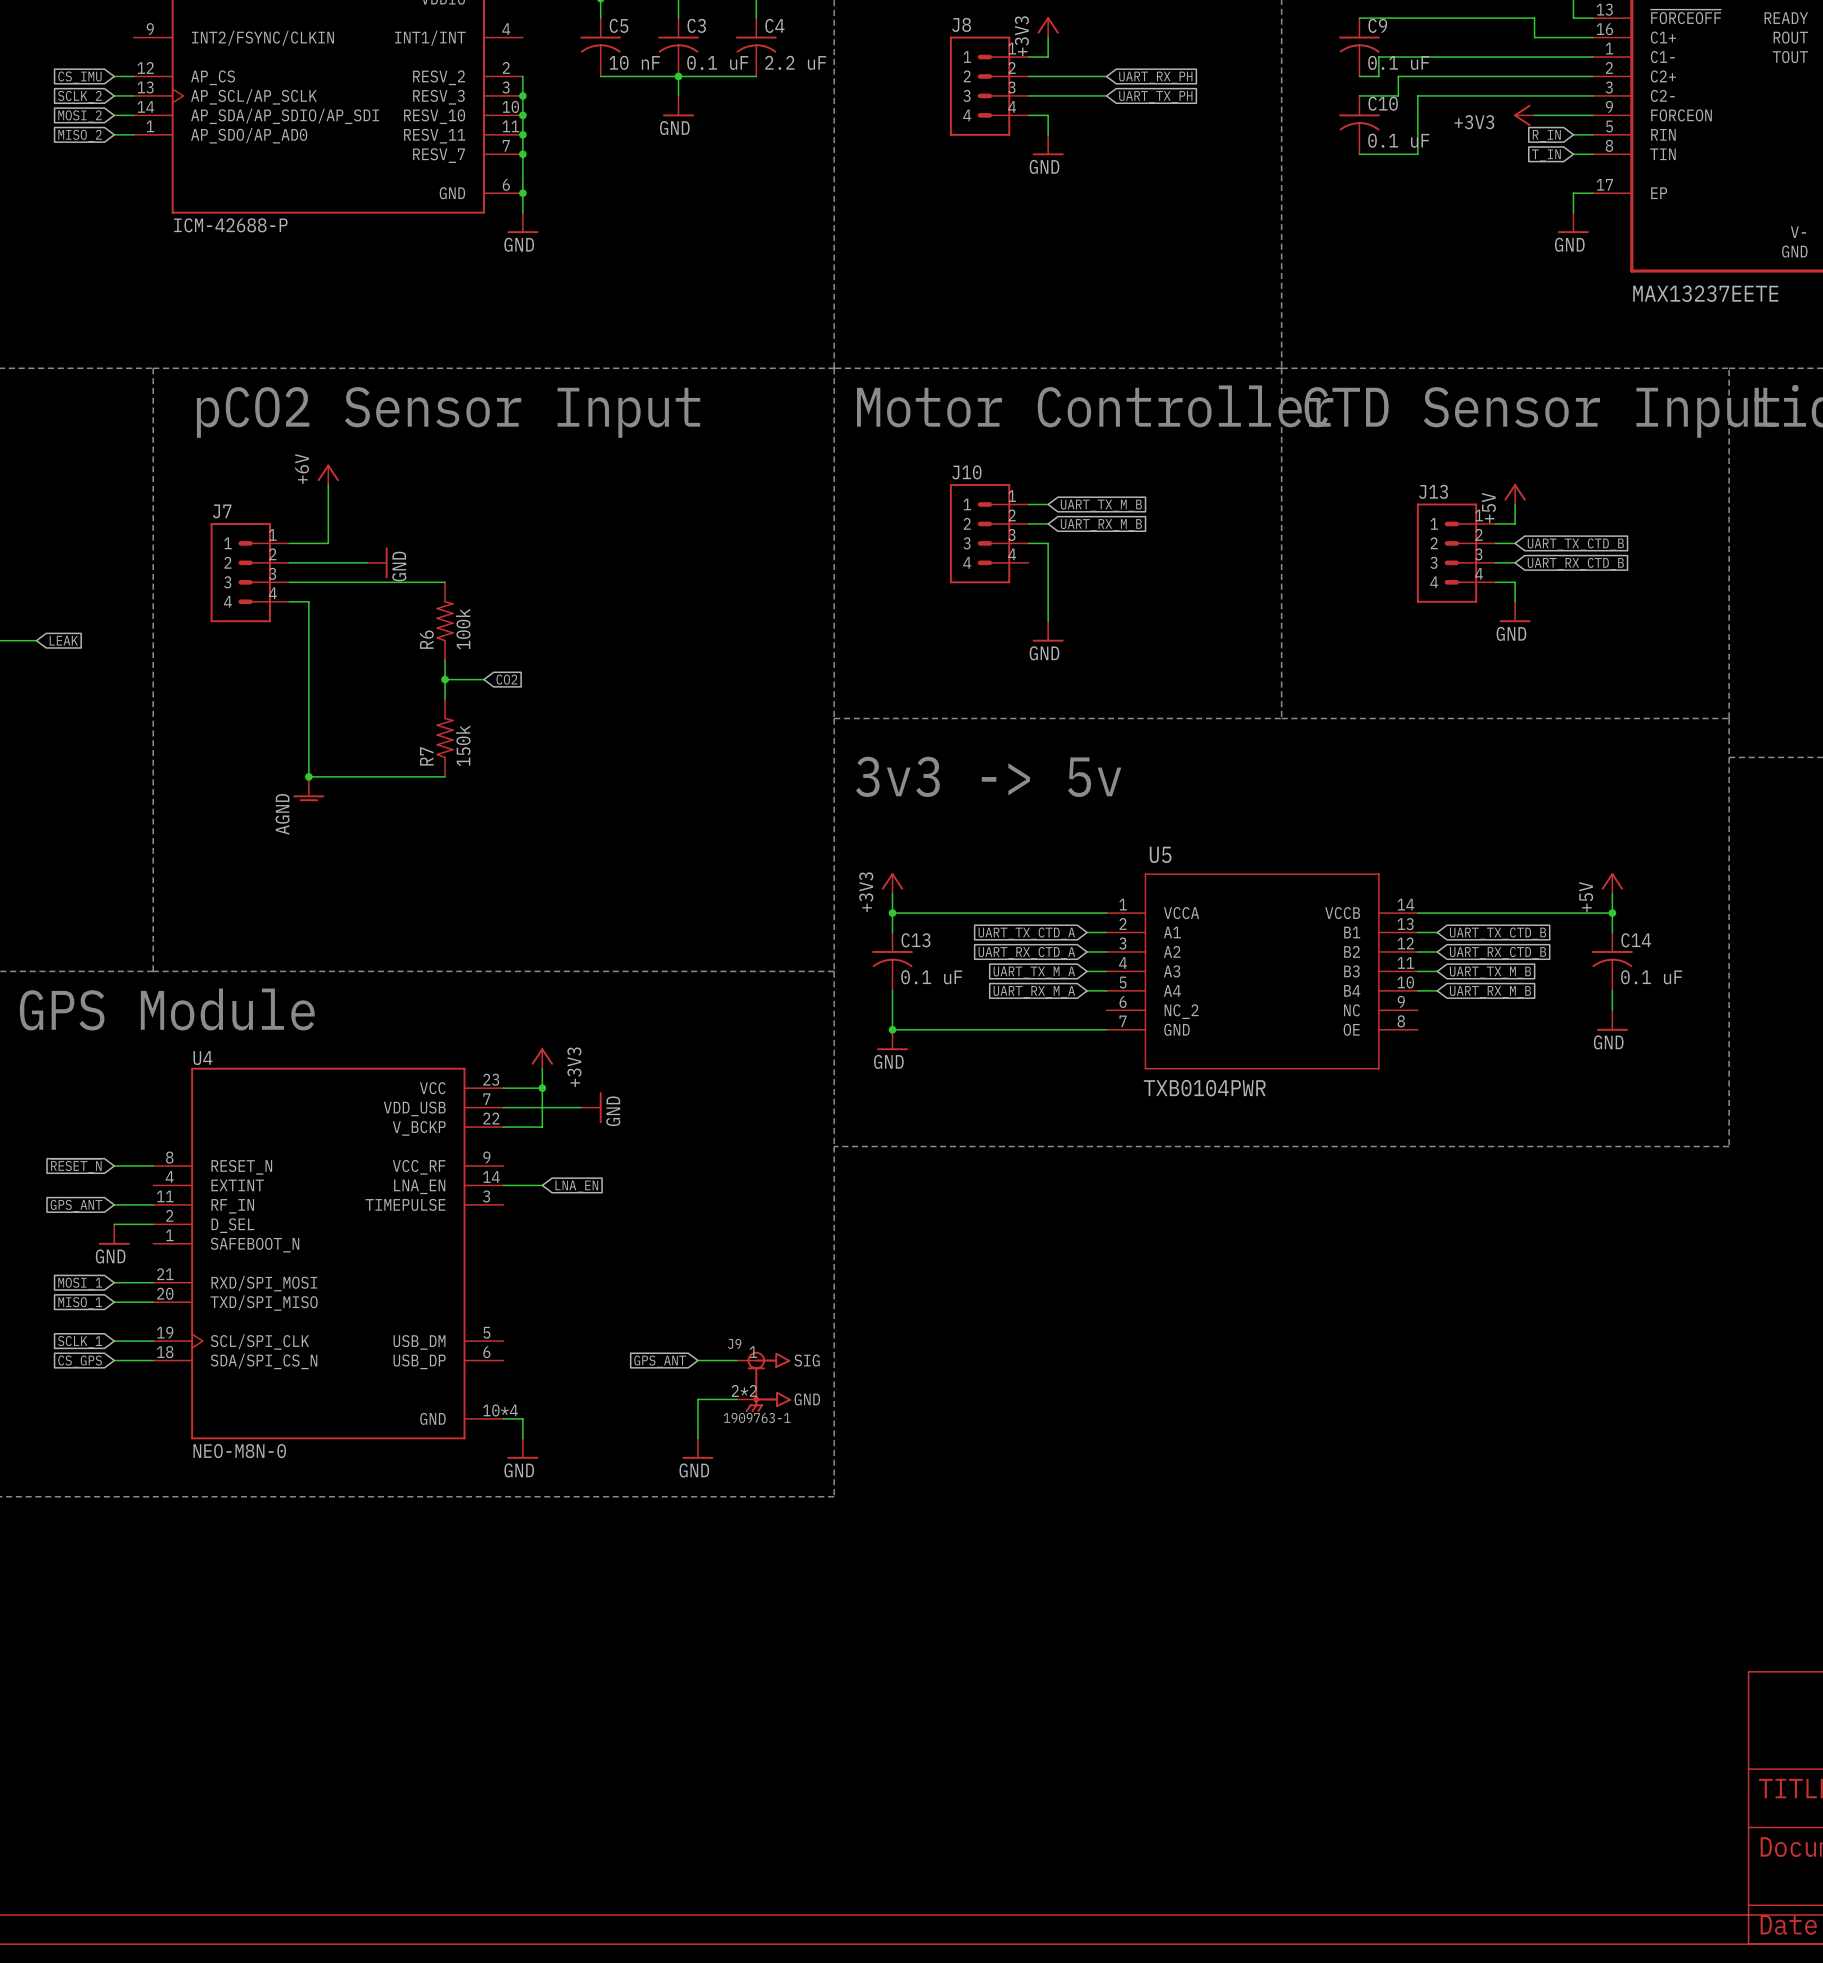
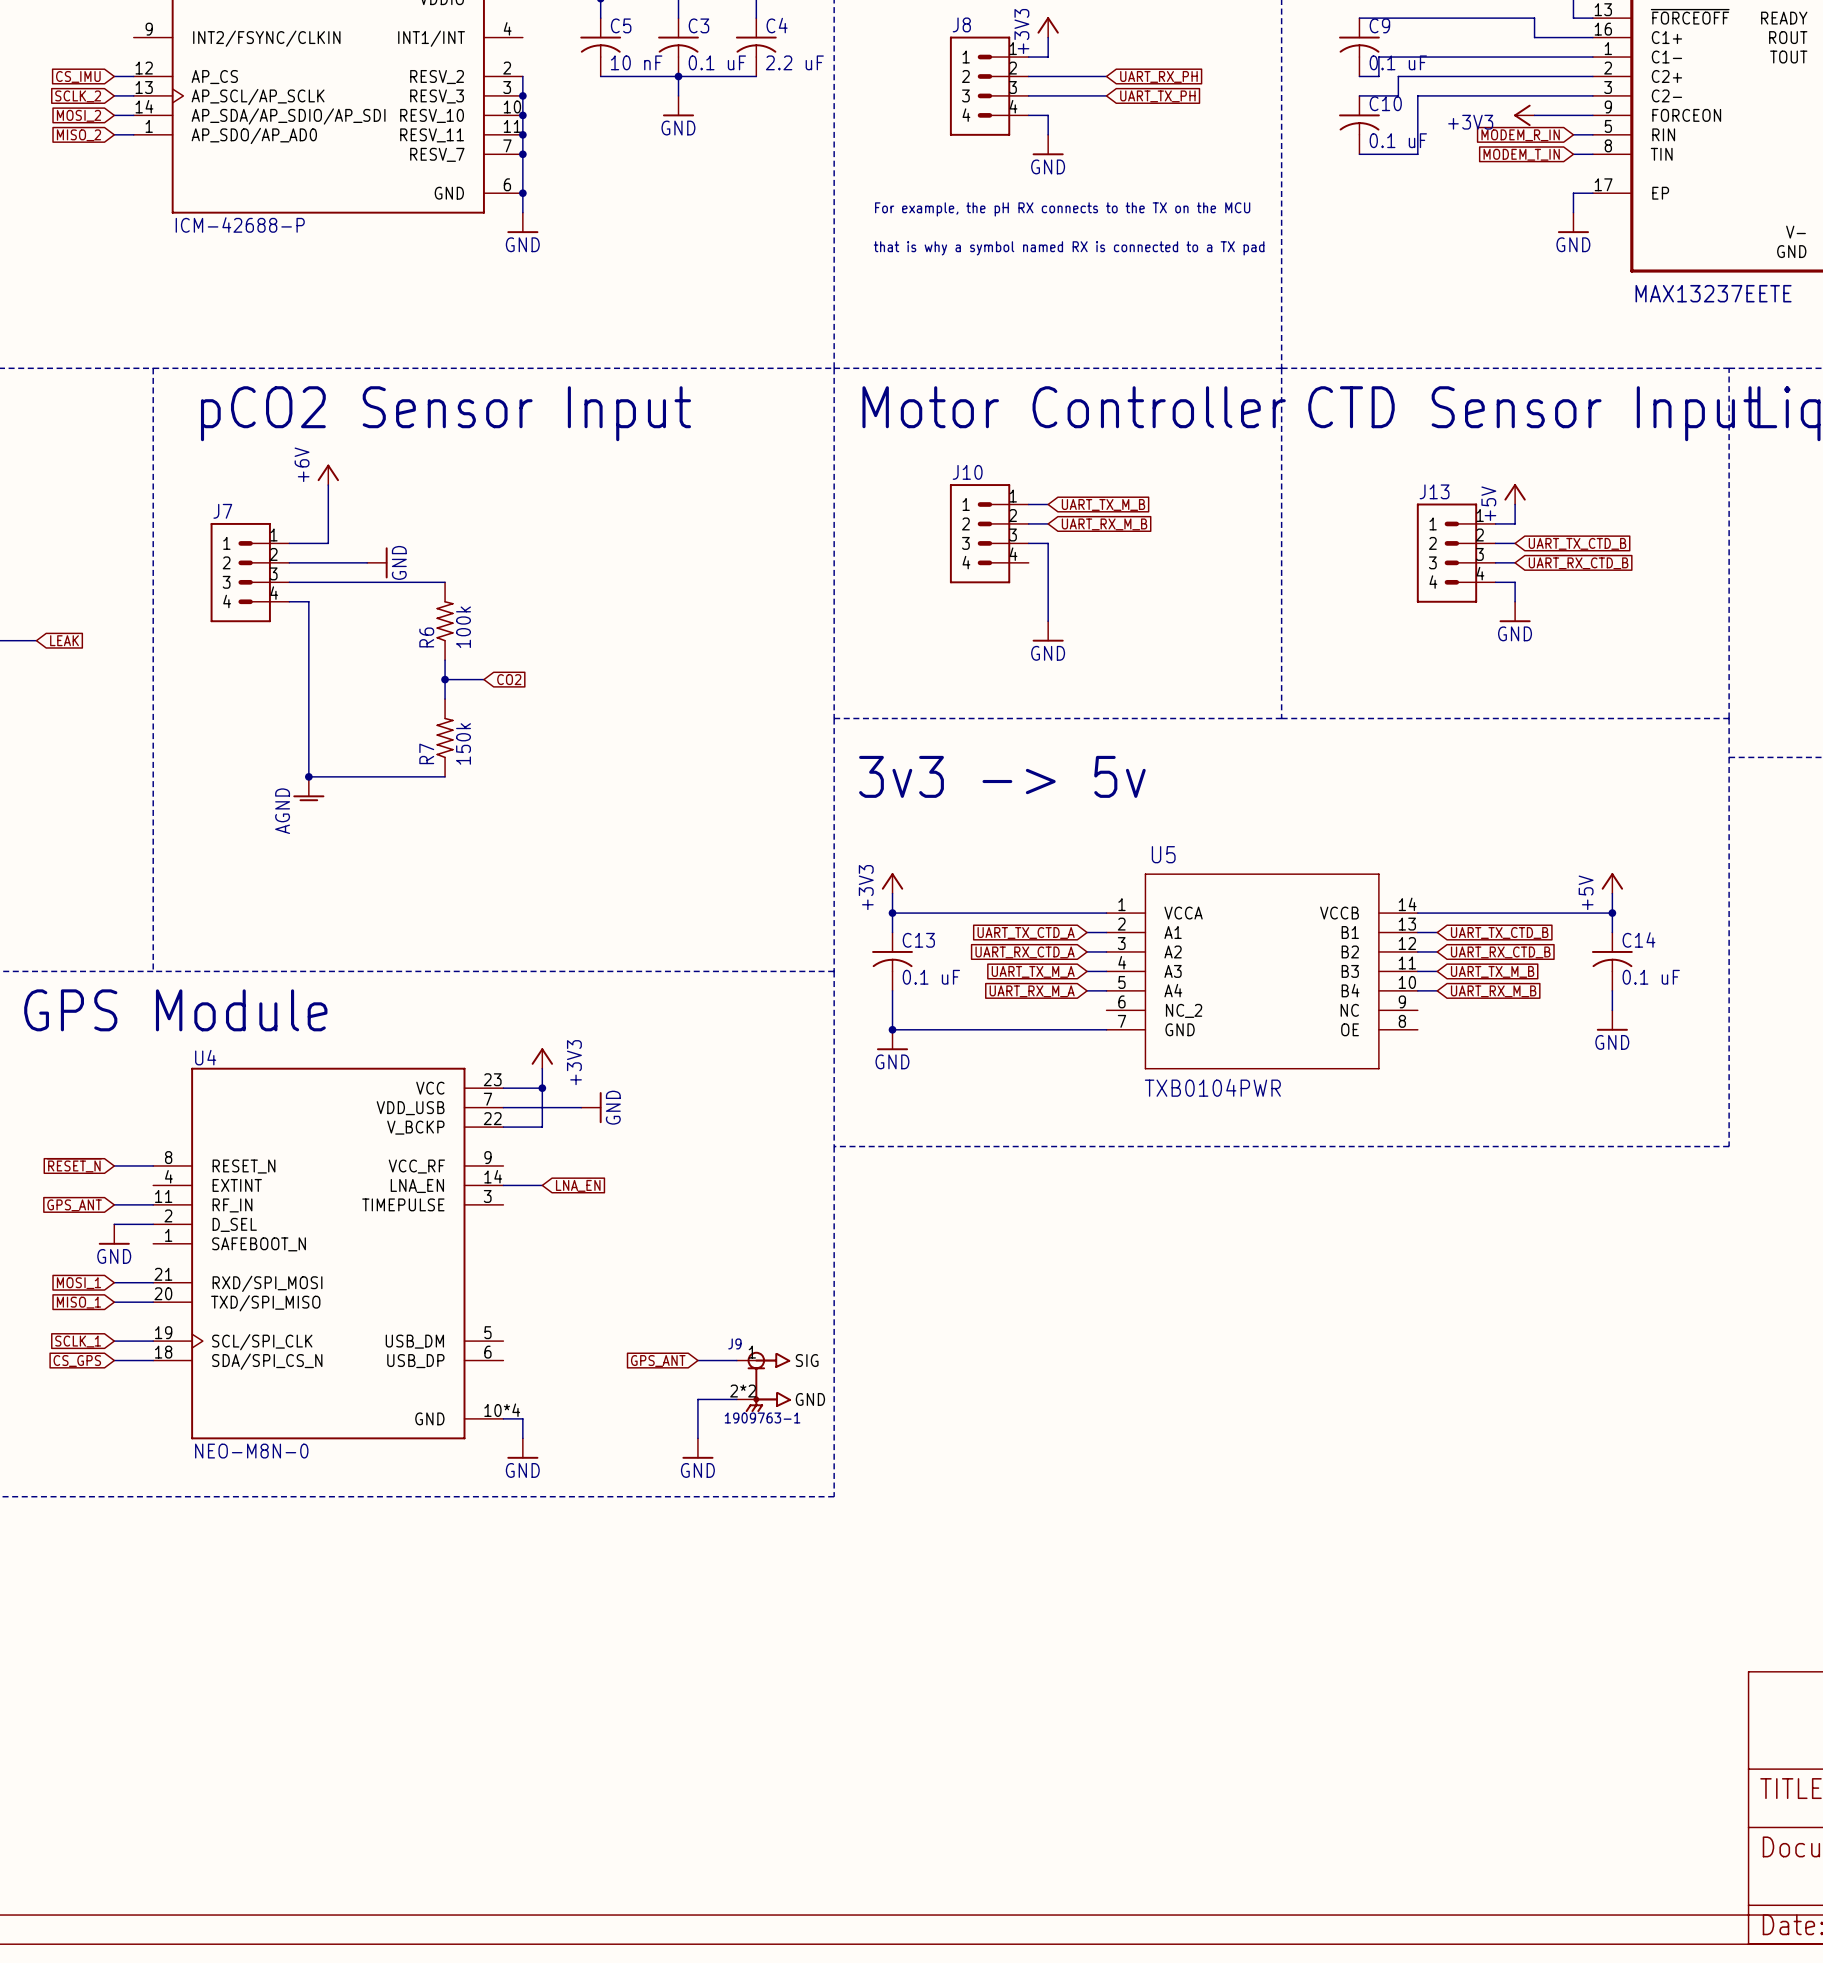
global label: R_IN (1546, 136) -> MODEM_R_IN (1520, 135)
global label: T_IN (1546, 155) -> MODEM_T_IN (1521, 154)
text: none -> For example, the pH RX connects to the TX on the MCU (1062, 209)
text: none -> that is why a symbol named RX is connected to a TX pad (1069, 248)

